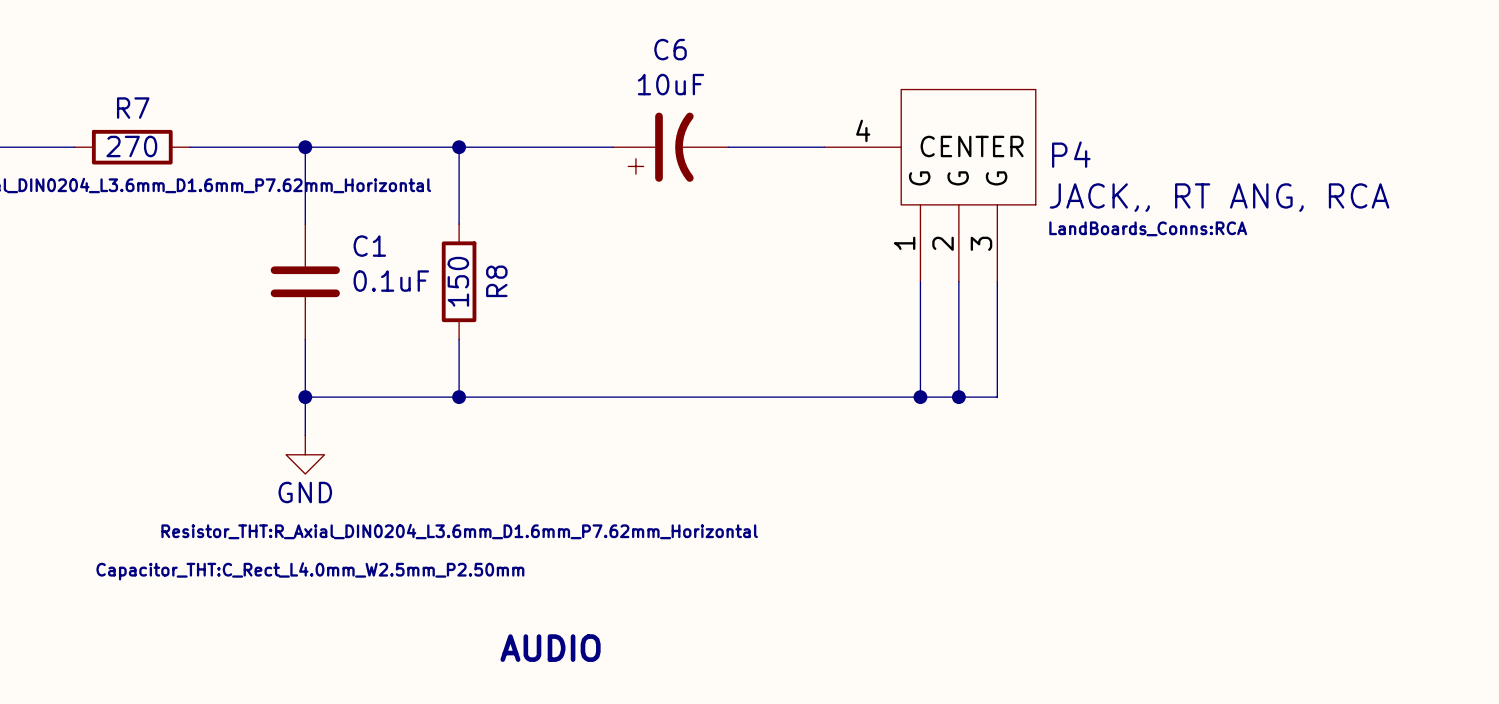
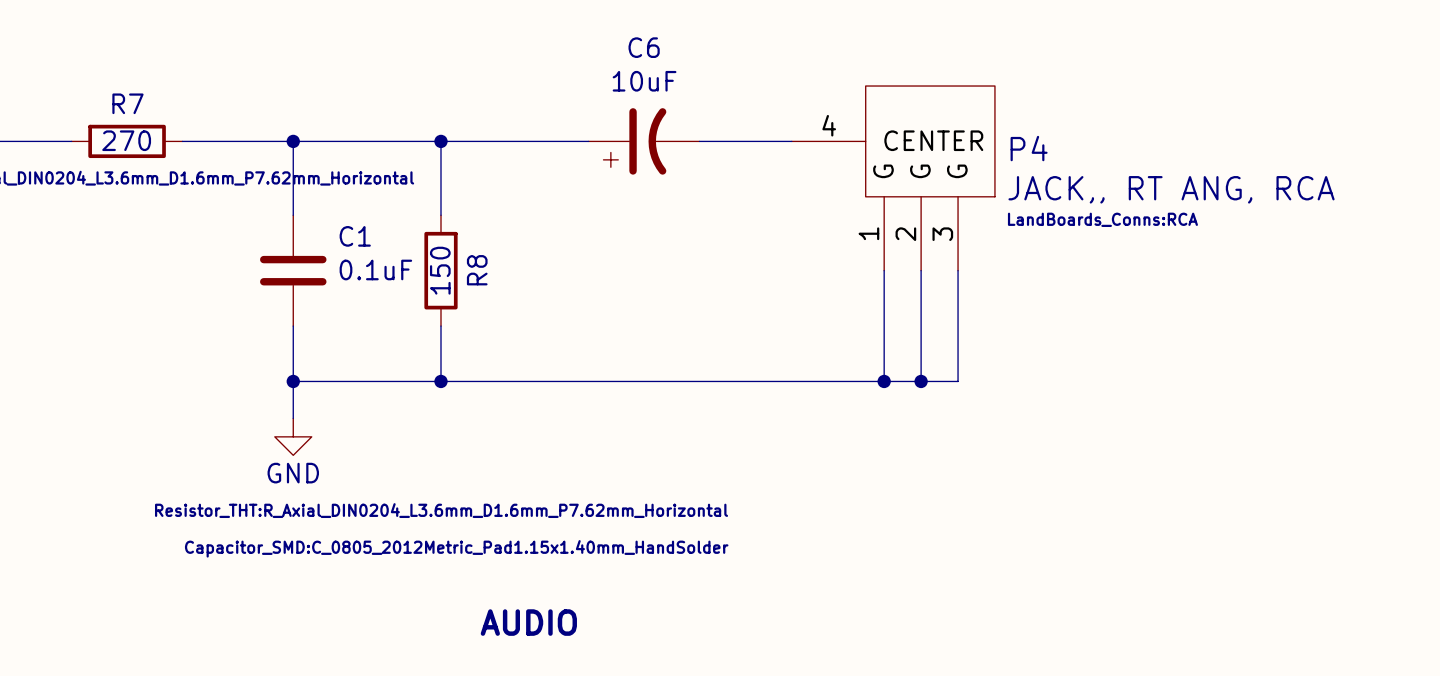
C1 text: Capacitor_THT:C_Rect_L4.0mm_W2.5mm_P2.50mm (310, 571) -> Capacitor_SMD:C_0805_2012Metric_Pad1.15x1.40mm_HandSolder (456, 548)

